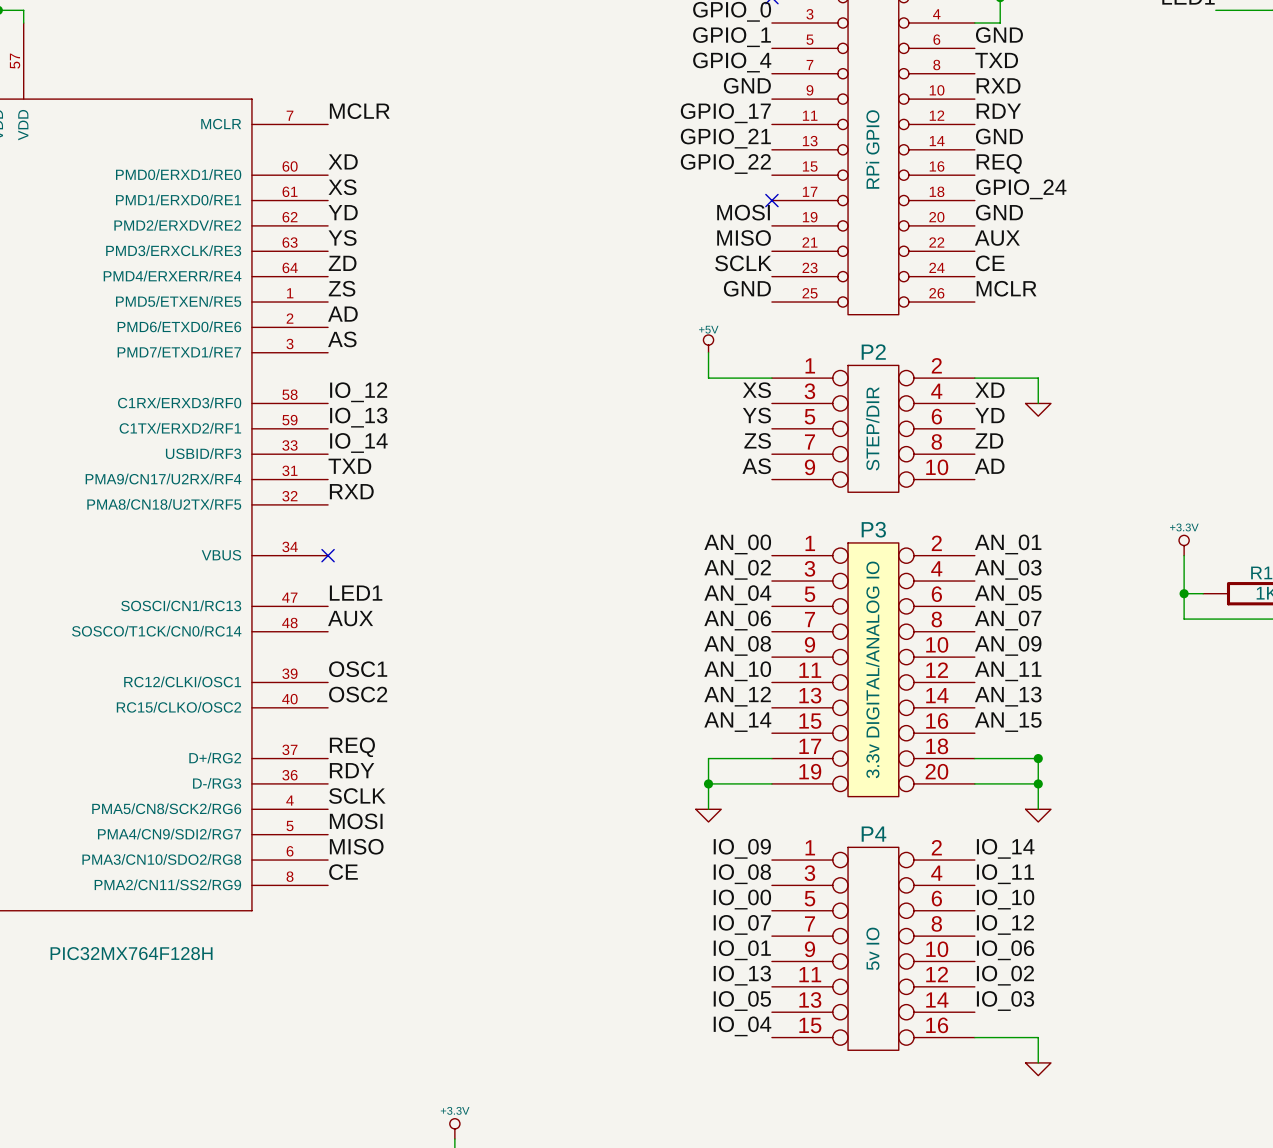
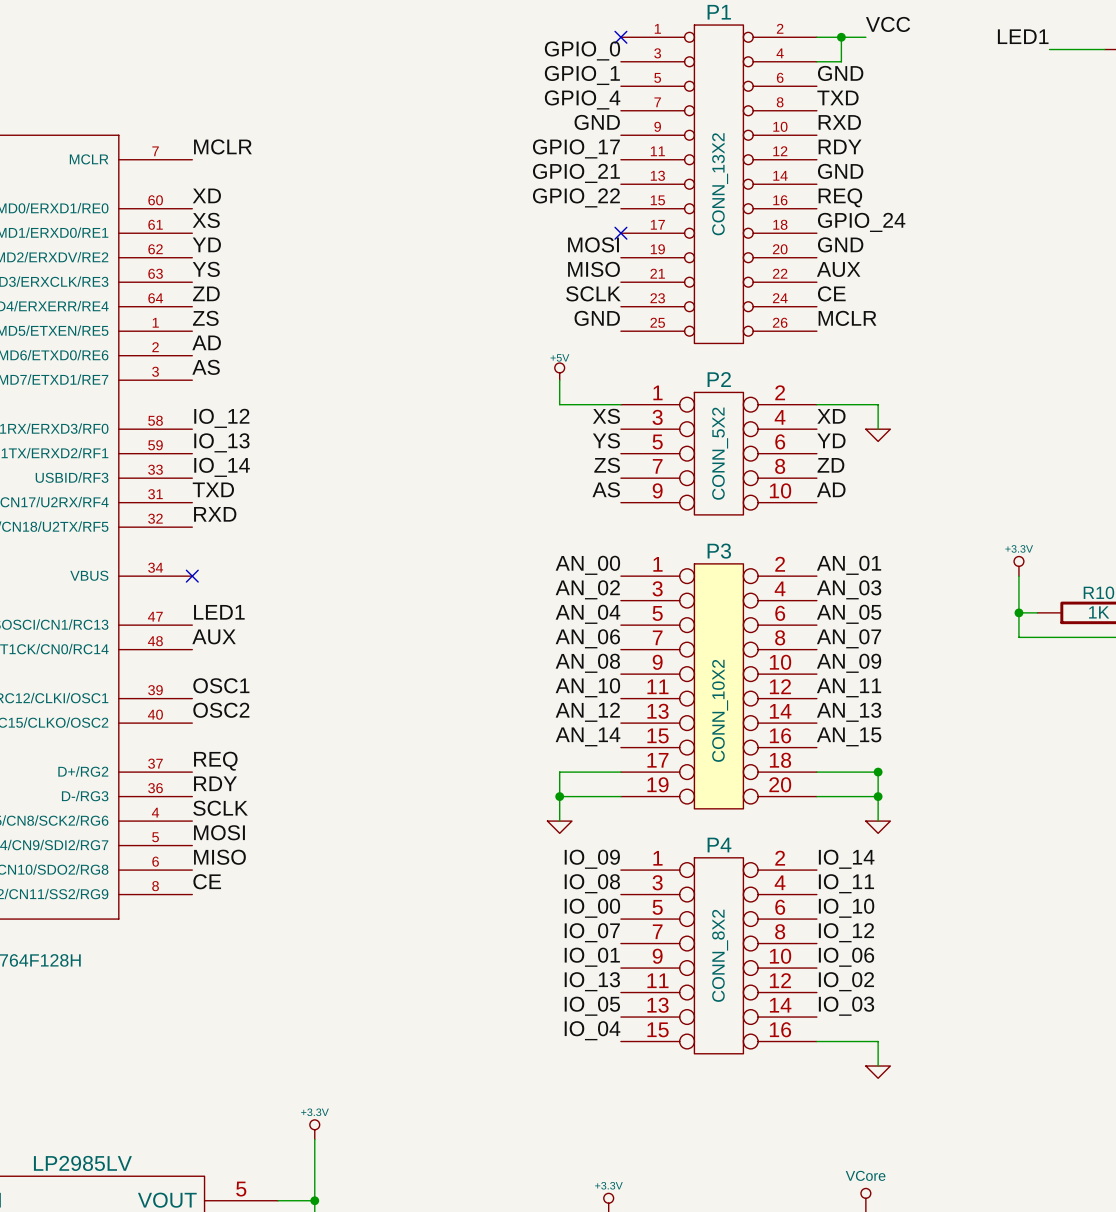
P1 value: RPi GPIO (872, 149) -> CONN_13X2 (720, 184)
P2 value: STEP/DIR (872, 428) -> CONN_5X2 (720, 453)
P3 value: 3.3v DIGITAL/ANALOG IO (872, 669) -> CONN_10X2 (720, 710)
P4 value: 5v IO (872, 948) -> CONN_8X2 (720, 955)

